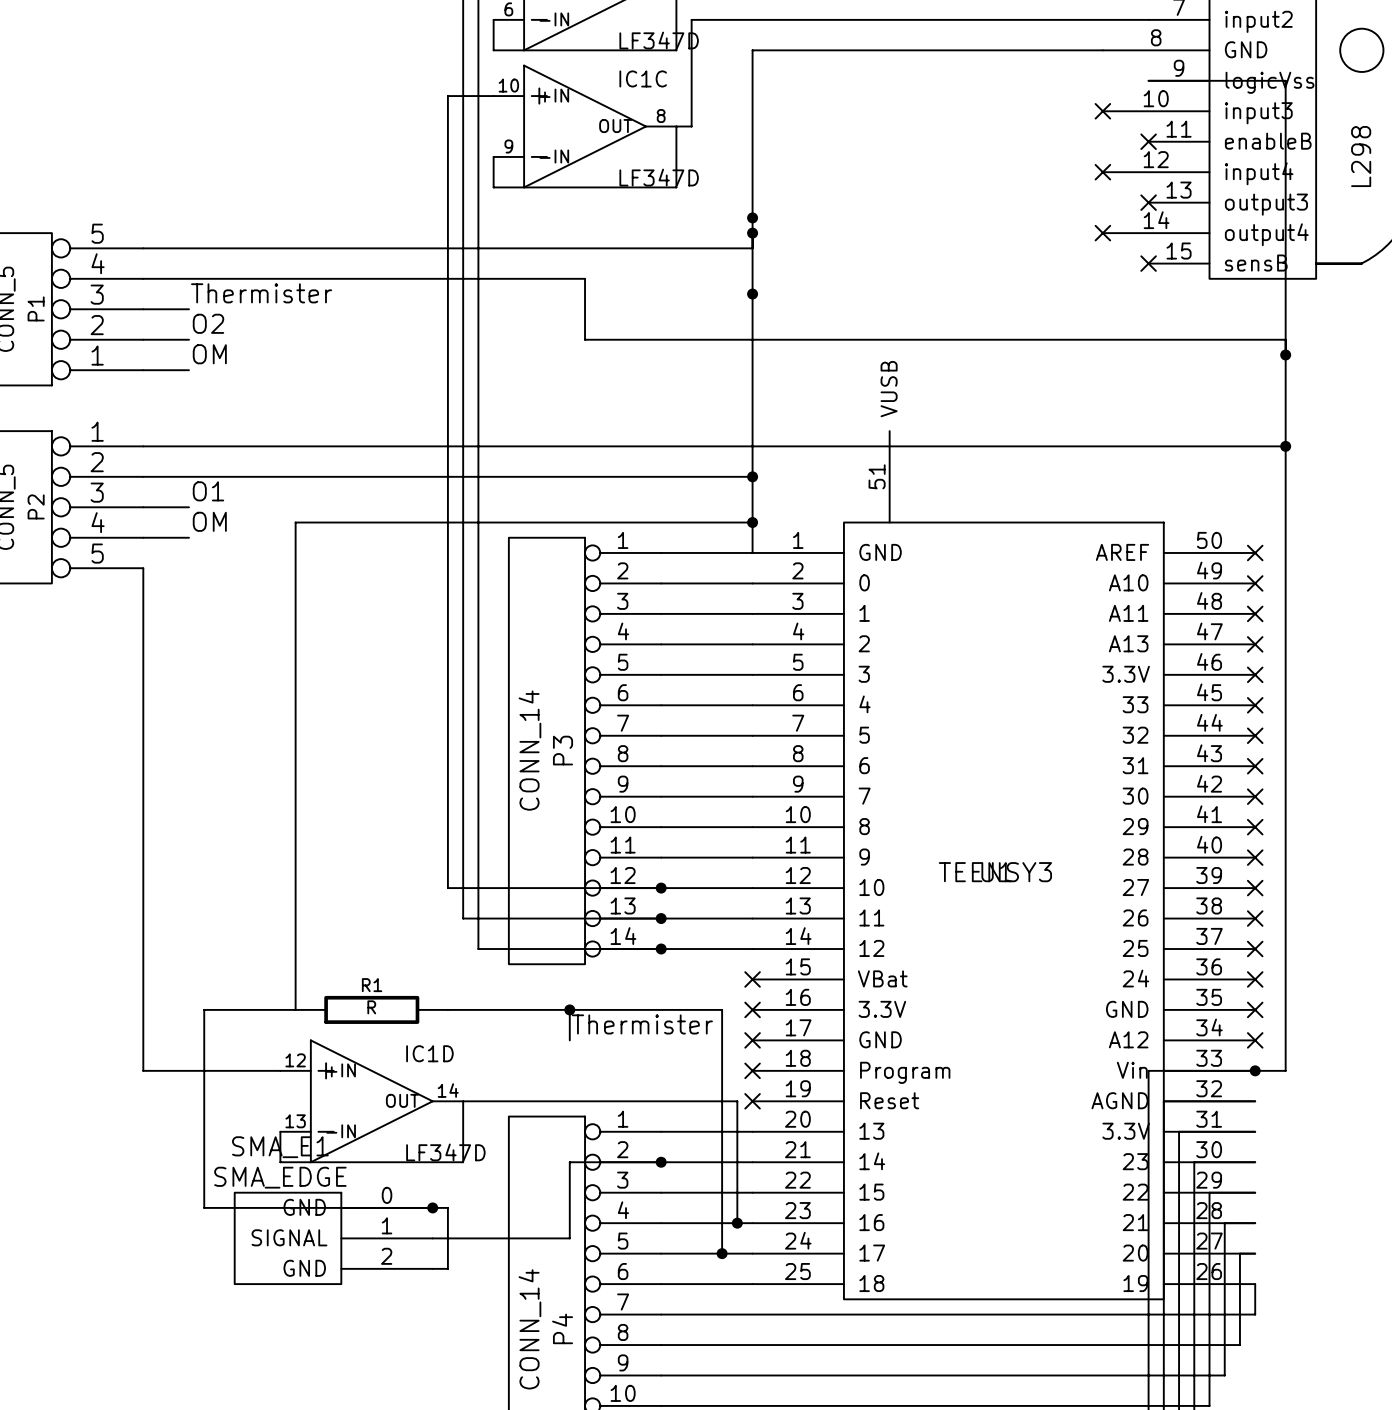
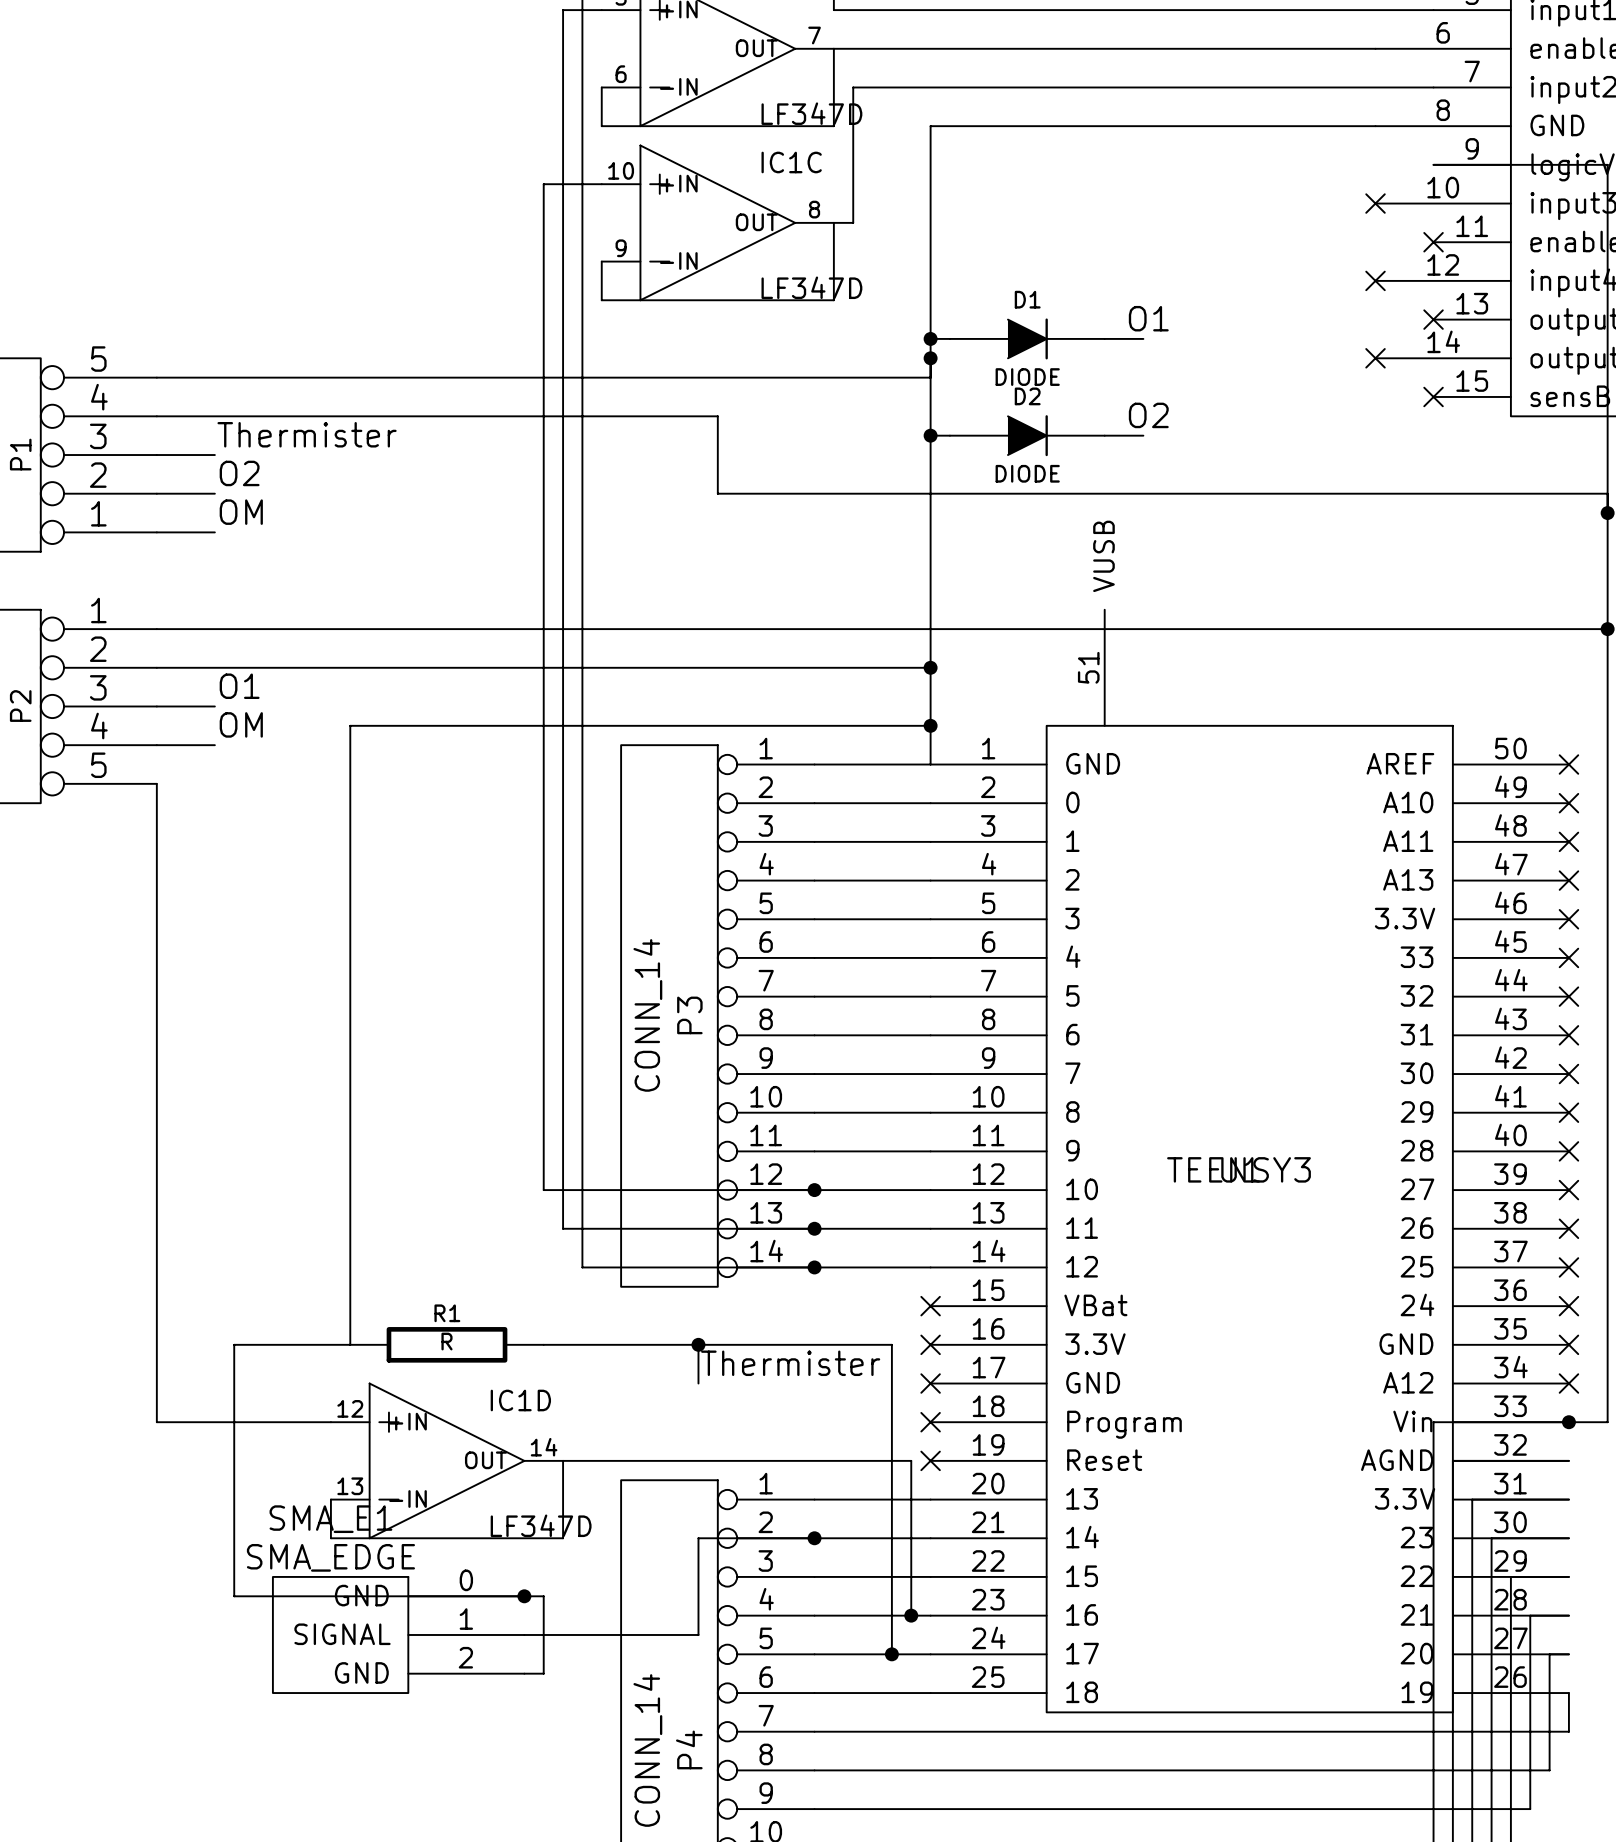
label: none -> O1 (1148, 318)
wire: none -> (930, 338) (949, 338)
D1: none -> DIODE (1027, 338)
wire: none -> (1104, 338) (1143, 338)
label: none -> O2 (1148, 415)
wire: none -> (930, 435) (949, 435)
D2: none -> DIODE (1027, 435)
wire: none -> (1104, 435) (1143, 435)

